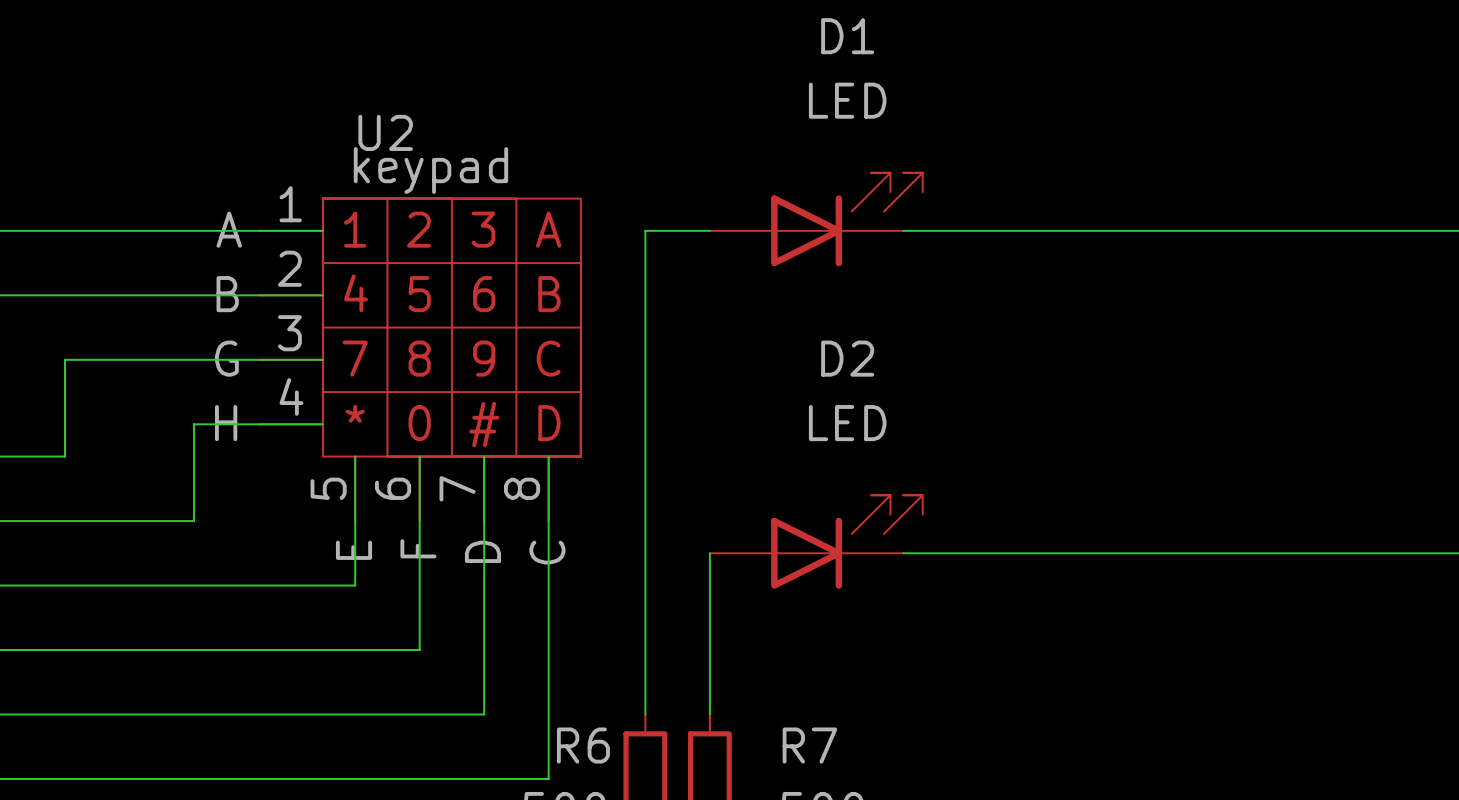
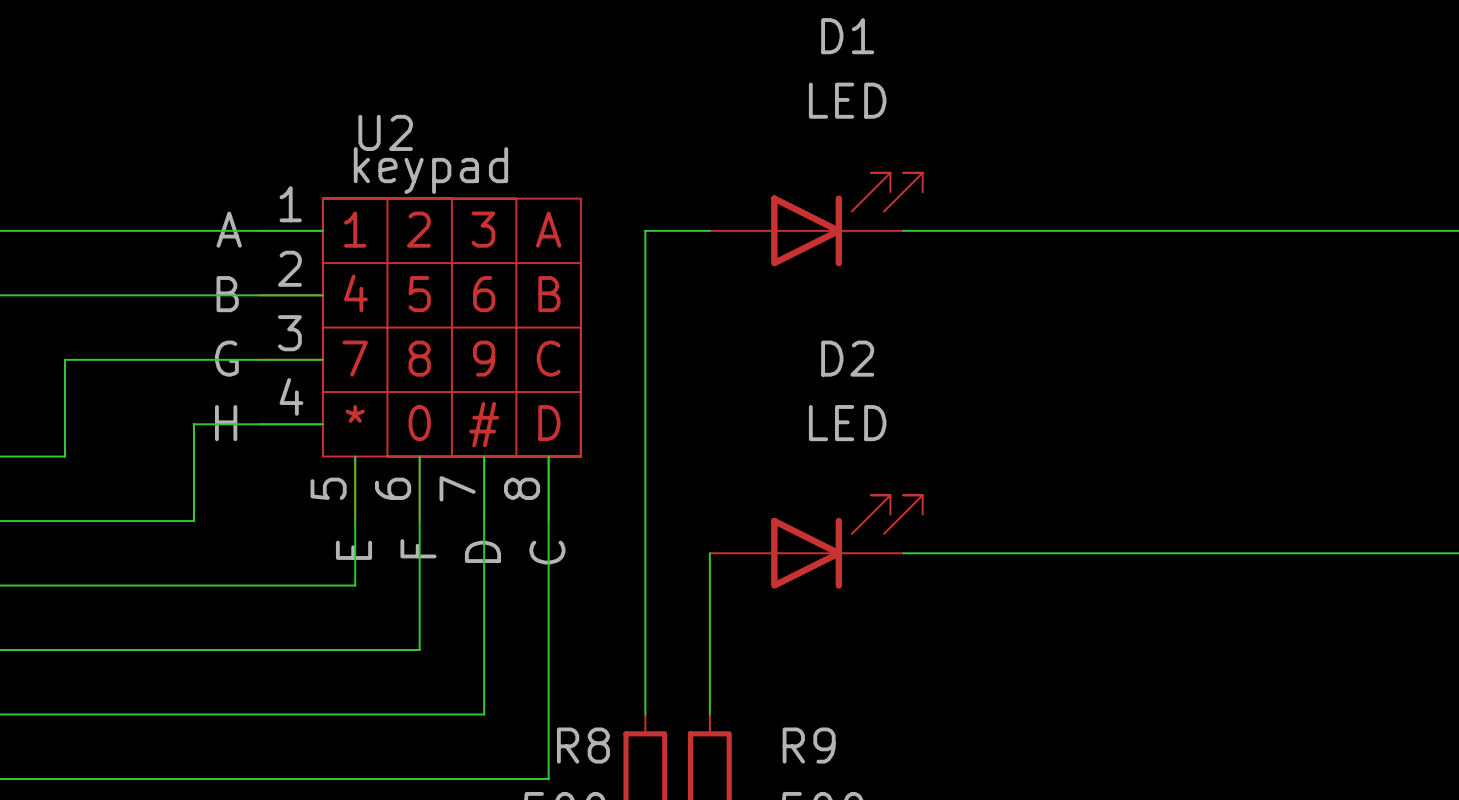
R6 name: R6 (583, 745) -> R8 (583, 745)
R7 name: R7 (809, 745) -> R9 (809, 745)

